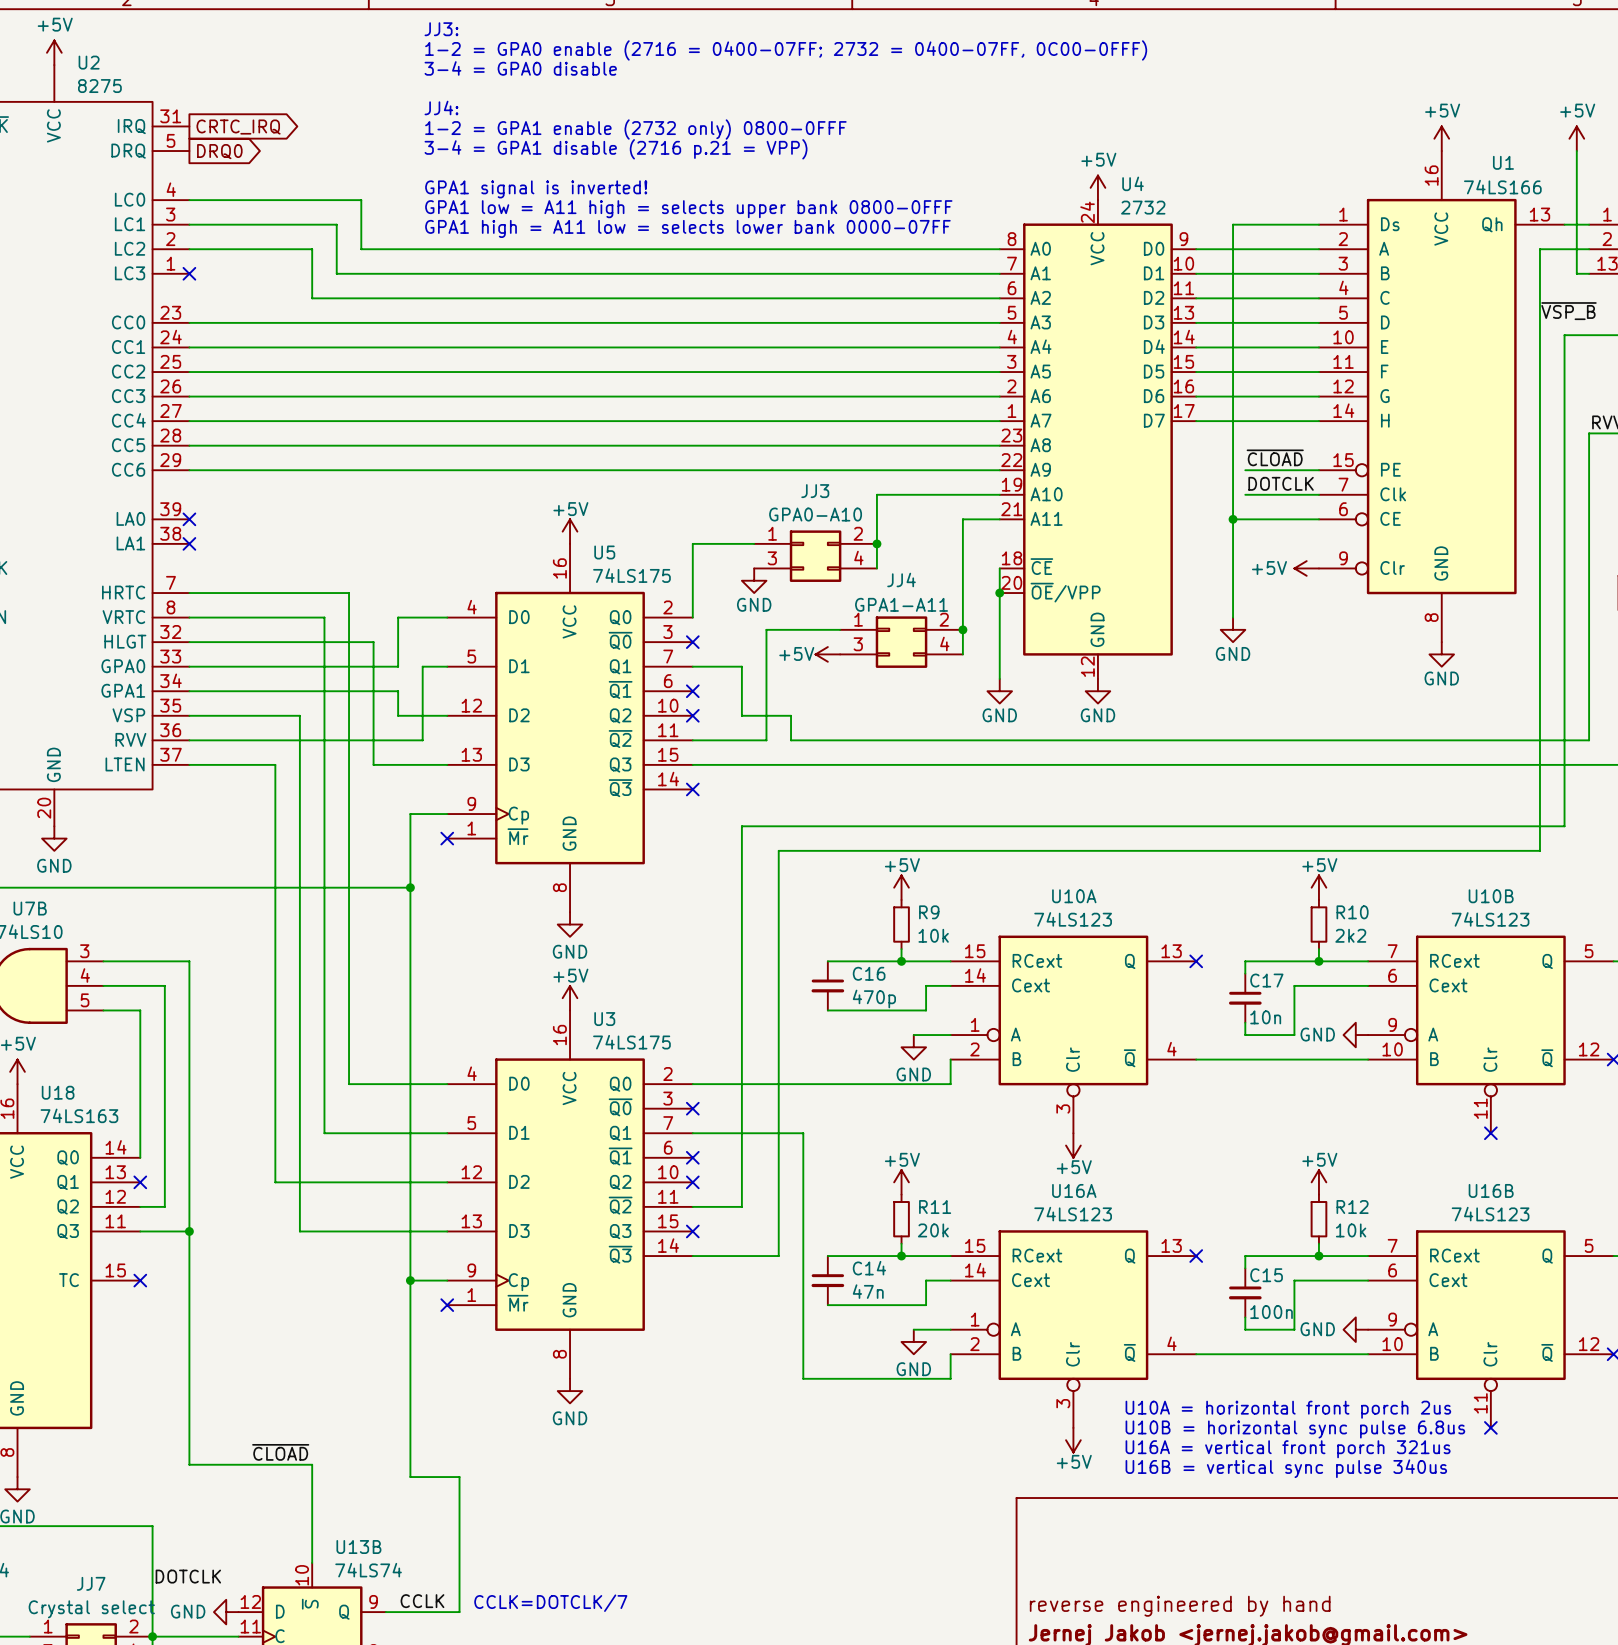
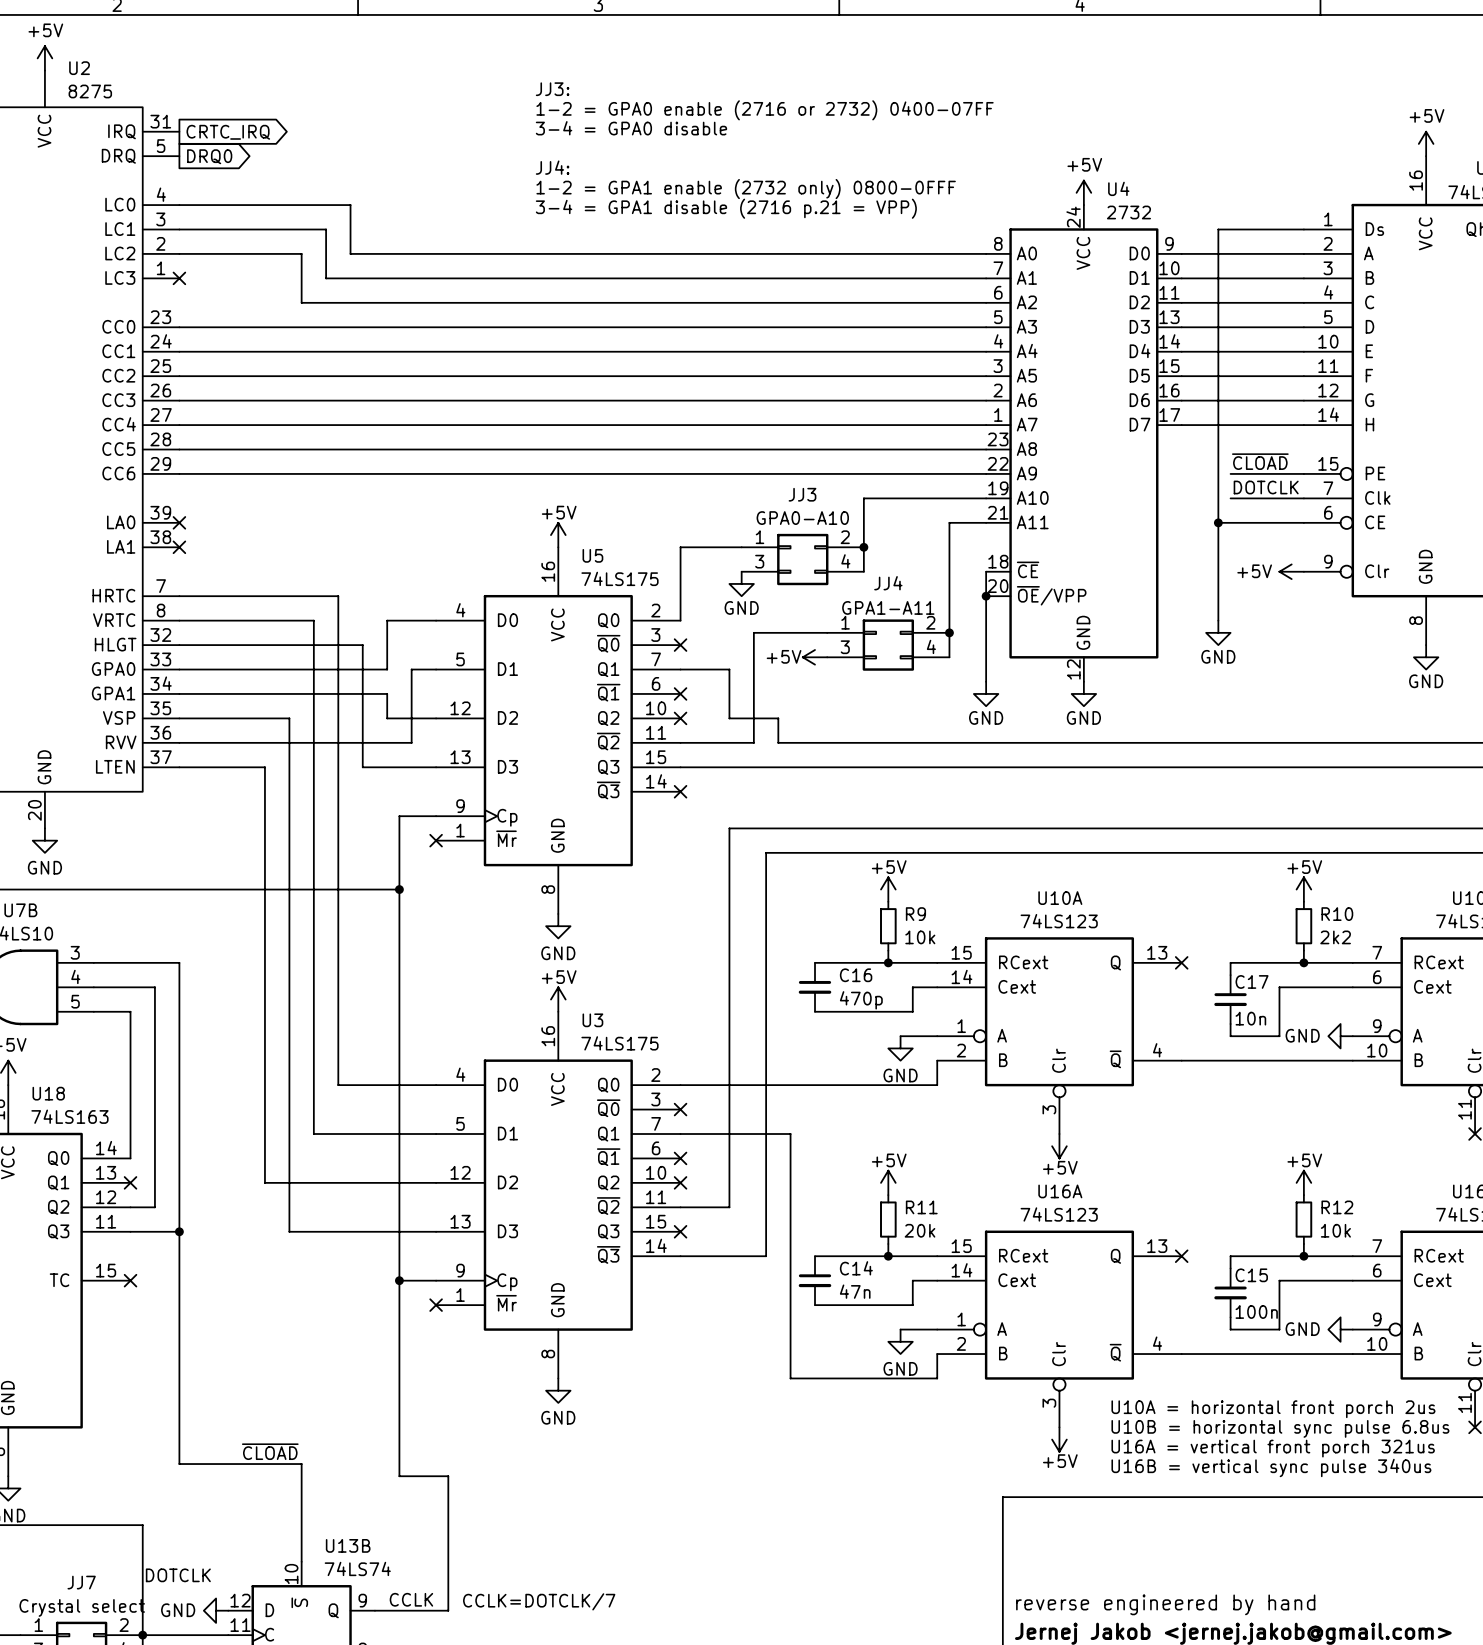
text position: JJ3: (441, 29) -> JJ3: (552, 89)
text: 1-2 = GPA0 enable (2716 = 0400-07FF; 2732 = 0400-07FF, 0C00-0FFF) (786, 50) -> none
text position: 3-4 = GPA0 disable (520, 68) -> 3-4 = GPA0 disable (631, 128)
text: none -> 1-2 = GPA0 enable (2716 or 2732) 0400-07FF (765, 110)
text position: JJ4: (441, 108) -> JJ4: (552, 167)
text position: 1-2 = GPA1 enable (2732 only) 0800-0FFF (635, 129) -> 1-2 = GPA1 enable (2732 only) 0800-0FFF (746, 189)
text position: 3-4 = GPA1 disable (2716 p.21 = VPP) (616, 149) -> 3-4 = GPA1 disable (2716 p.21 = VPP) (726, 208)
text: GPA1 signal is inverted! (536, 189) -> none
text: GPA1 low = A11 high = selects upper bank 0800-0FFF (688, 209) -> none
text: GPA1 high = A11 low = selects lower bank 0000-07FF (687, 228) -> none

